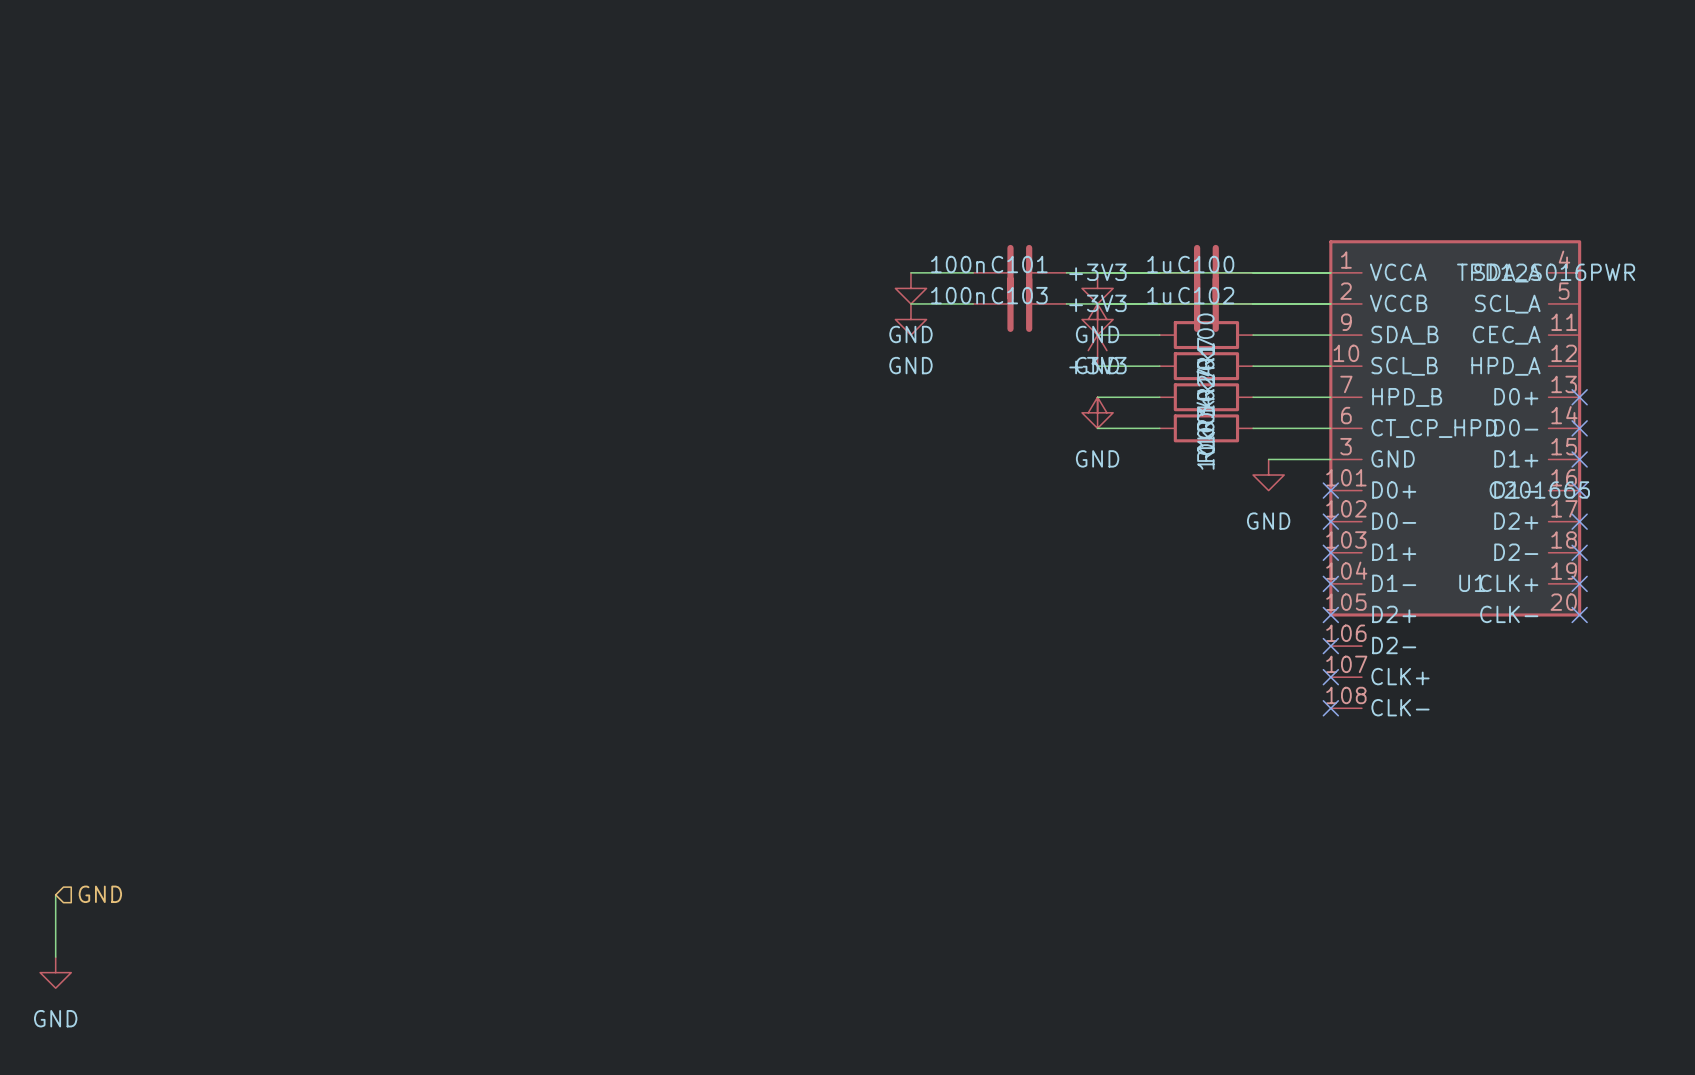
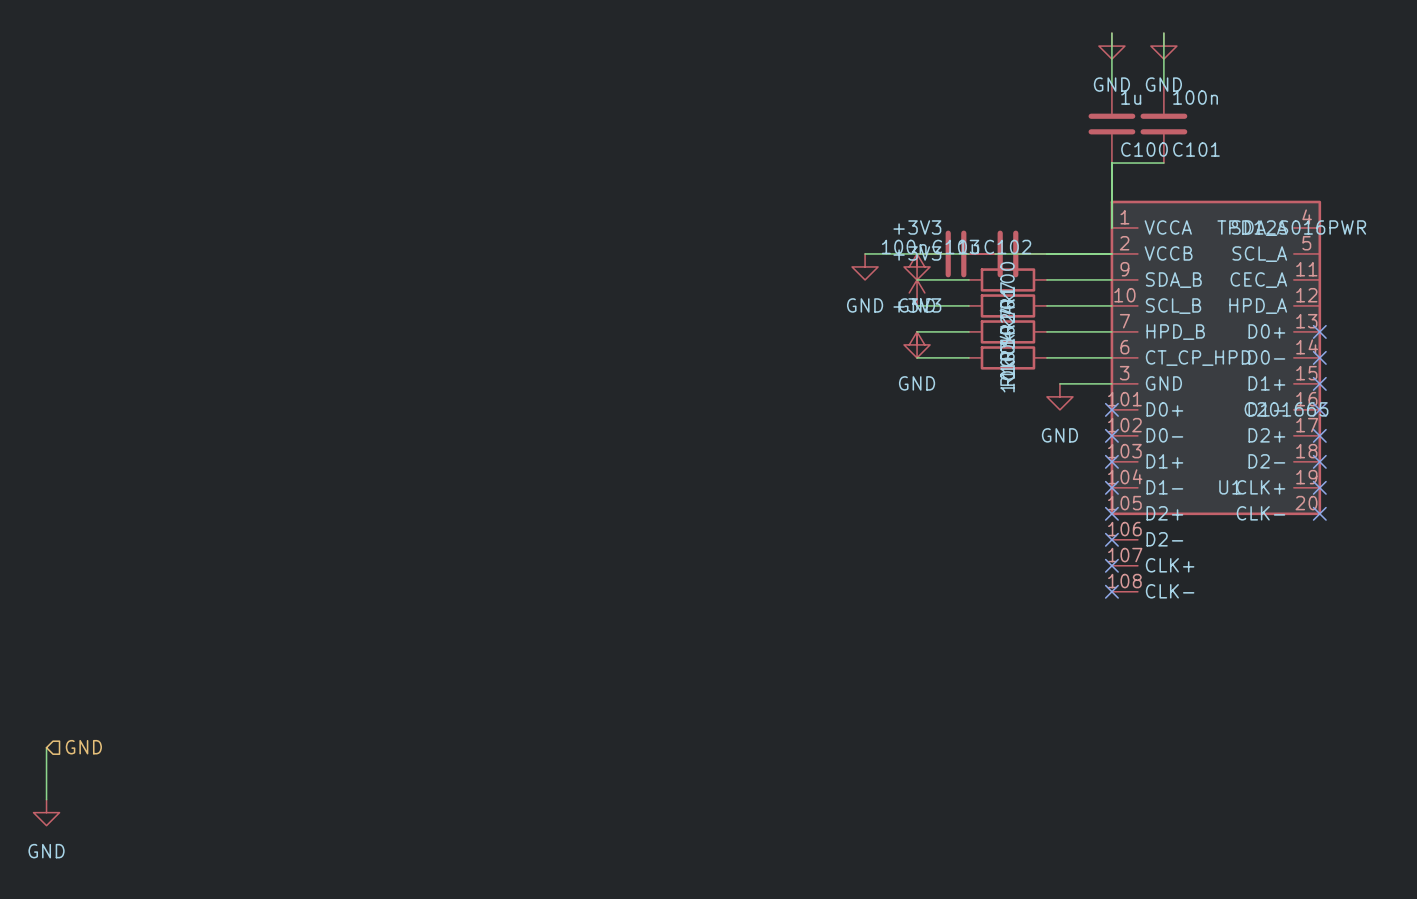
wire: none -> (1111, 33) (1111, 85)
wire: none -> (1163, 33) (1163, 85)
power symbol: none -> GND (1111, 46)
power symbol: none -> GND (1163, 46)
C101 value position: 100n (957, 264) -> 100n (1195, 97)
C101 name position: C101 (1019, 264) -> C101 (1196, 149)
C100 value position: 1u (1159, 264) -> 1u (1131, 97)
C100 name position: C100 (1206, 264) -> C100 (1144, 149)
wire: (910, 272) (973, 272) -> none
C101 rotation: 0° (1019, 272) -> 90° clockwise (1163, 124)
C101 position: (1019, 272) -> (1163, 124)
wire: (1066, 272) (1330, 272) -> (1163, 163) (1111, 163) (1111, 227)
C100 rotation: 0° (1206, 272) -> 90° clockwise (1111, 124)
C100 position: (1206, 272) -> (1111, 124)
power symbol: GND (910, 288) -> none
power symbol: GND (1097, 288) -> none
wire: (910, 303) (973, 303) -> none
C103 position: (1019, 303) -> (956, 253)
power symbol: GND (910, 319) -> none
power symbol: none -> GND (865, 266)

